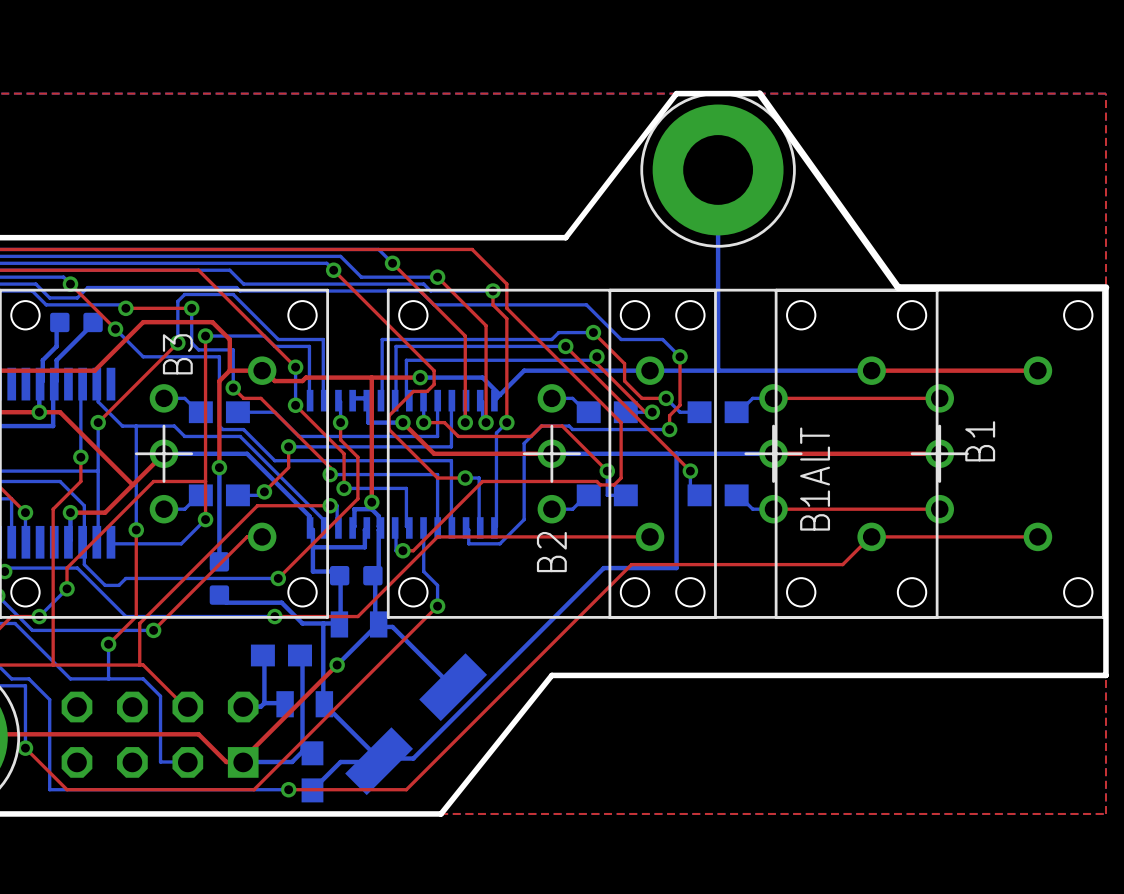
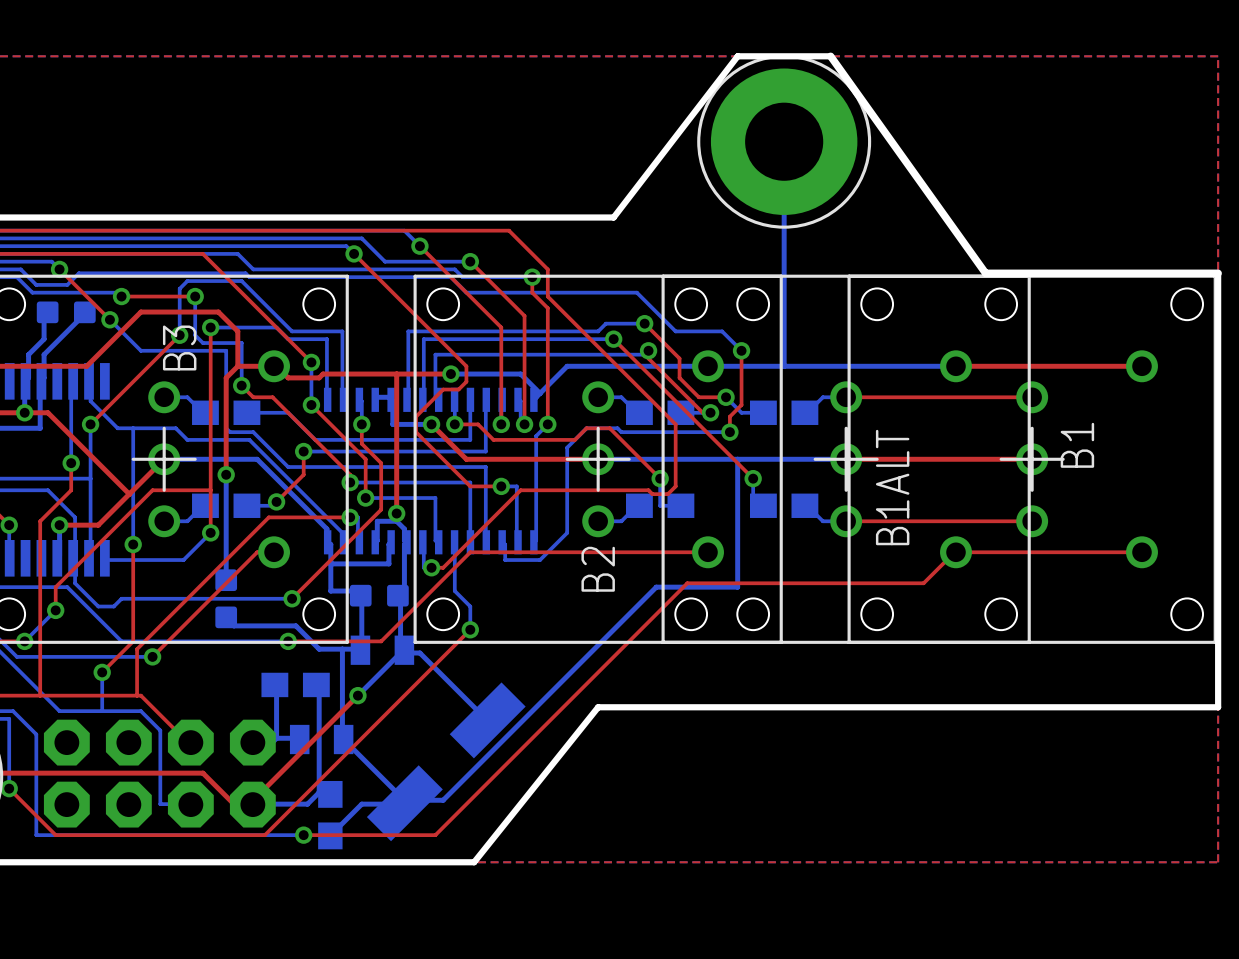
part footprint: [61, 691, 259, 778] -> [43, 719, 276, 828]

